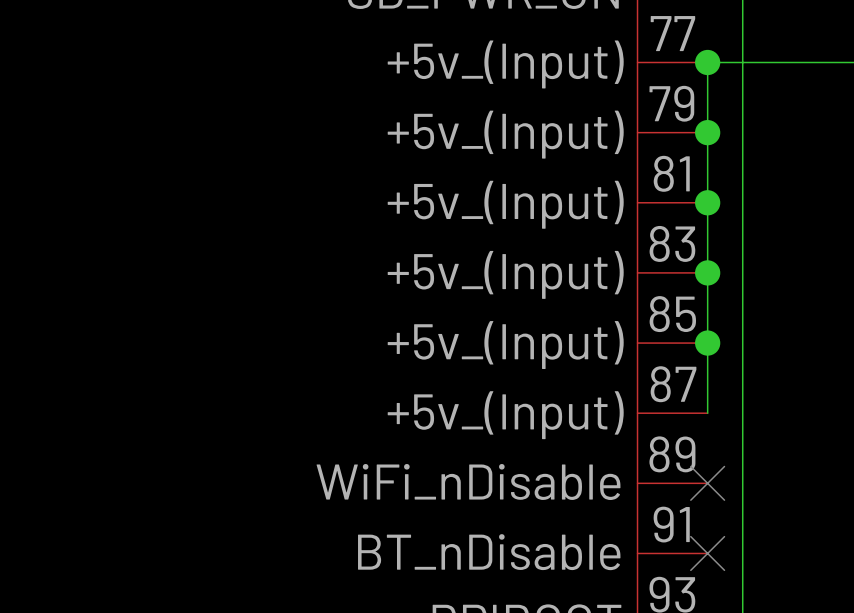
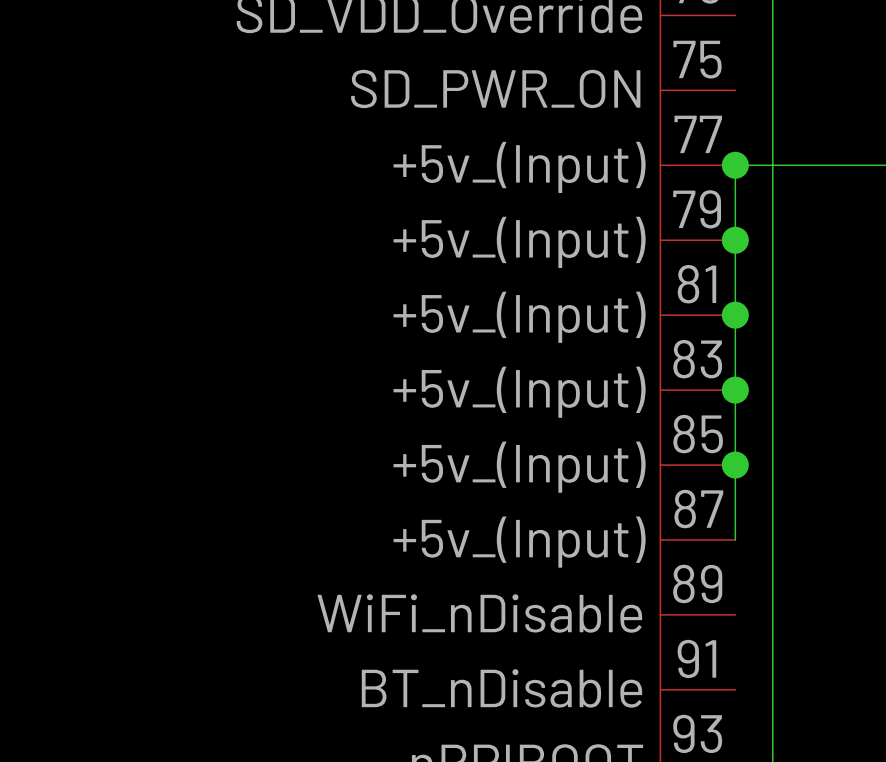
no-connect mark: (707, 483) -> none
no-connect mark: (707, 553) -> none

